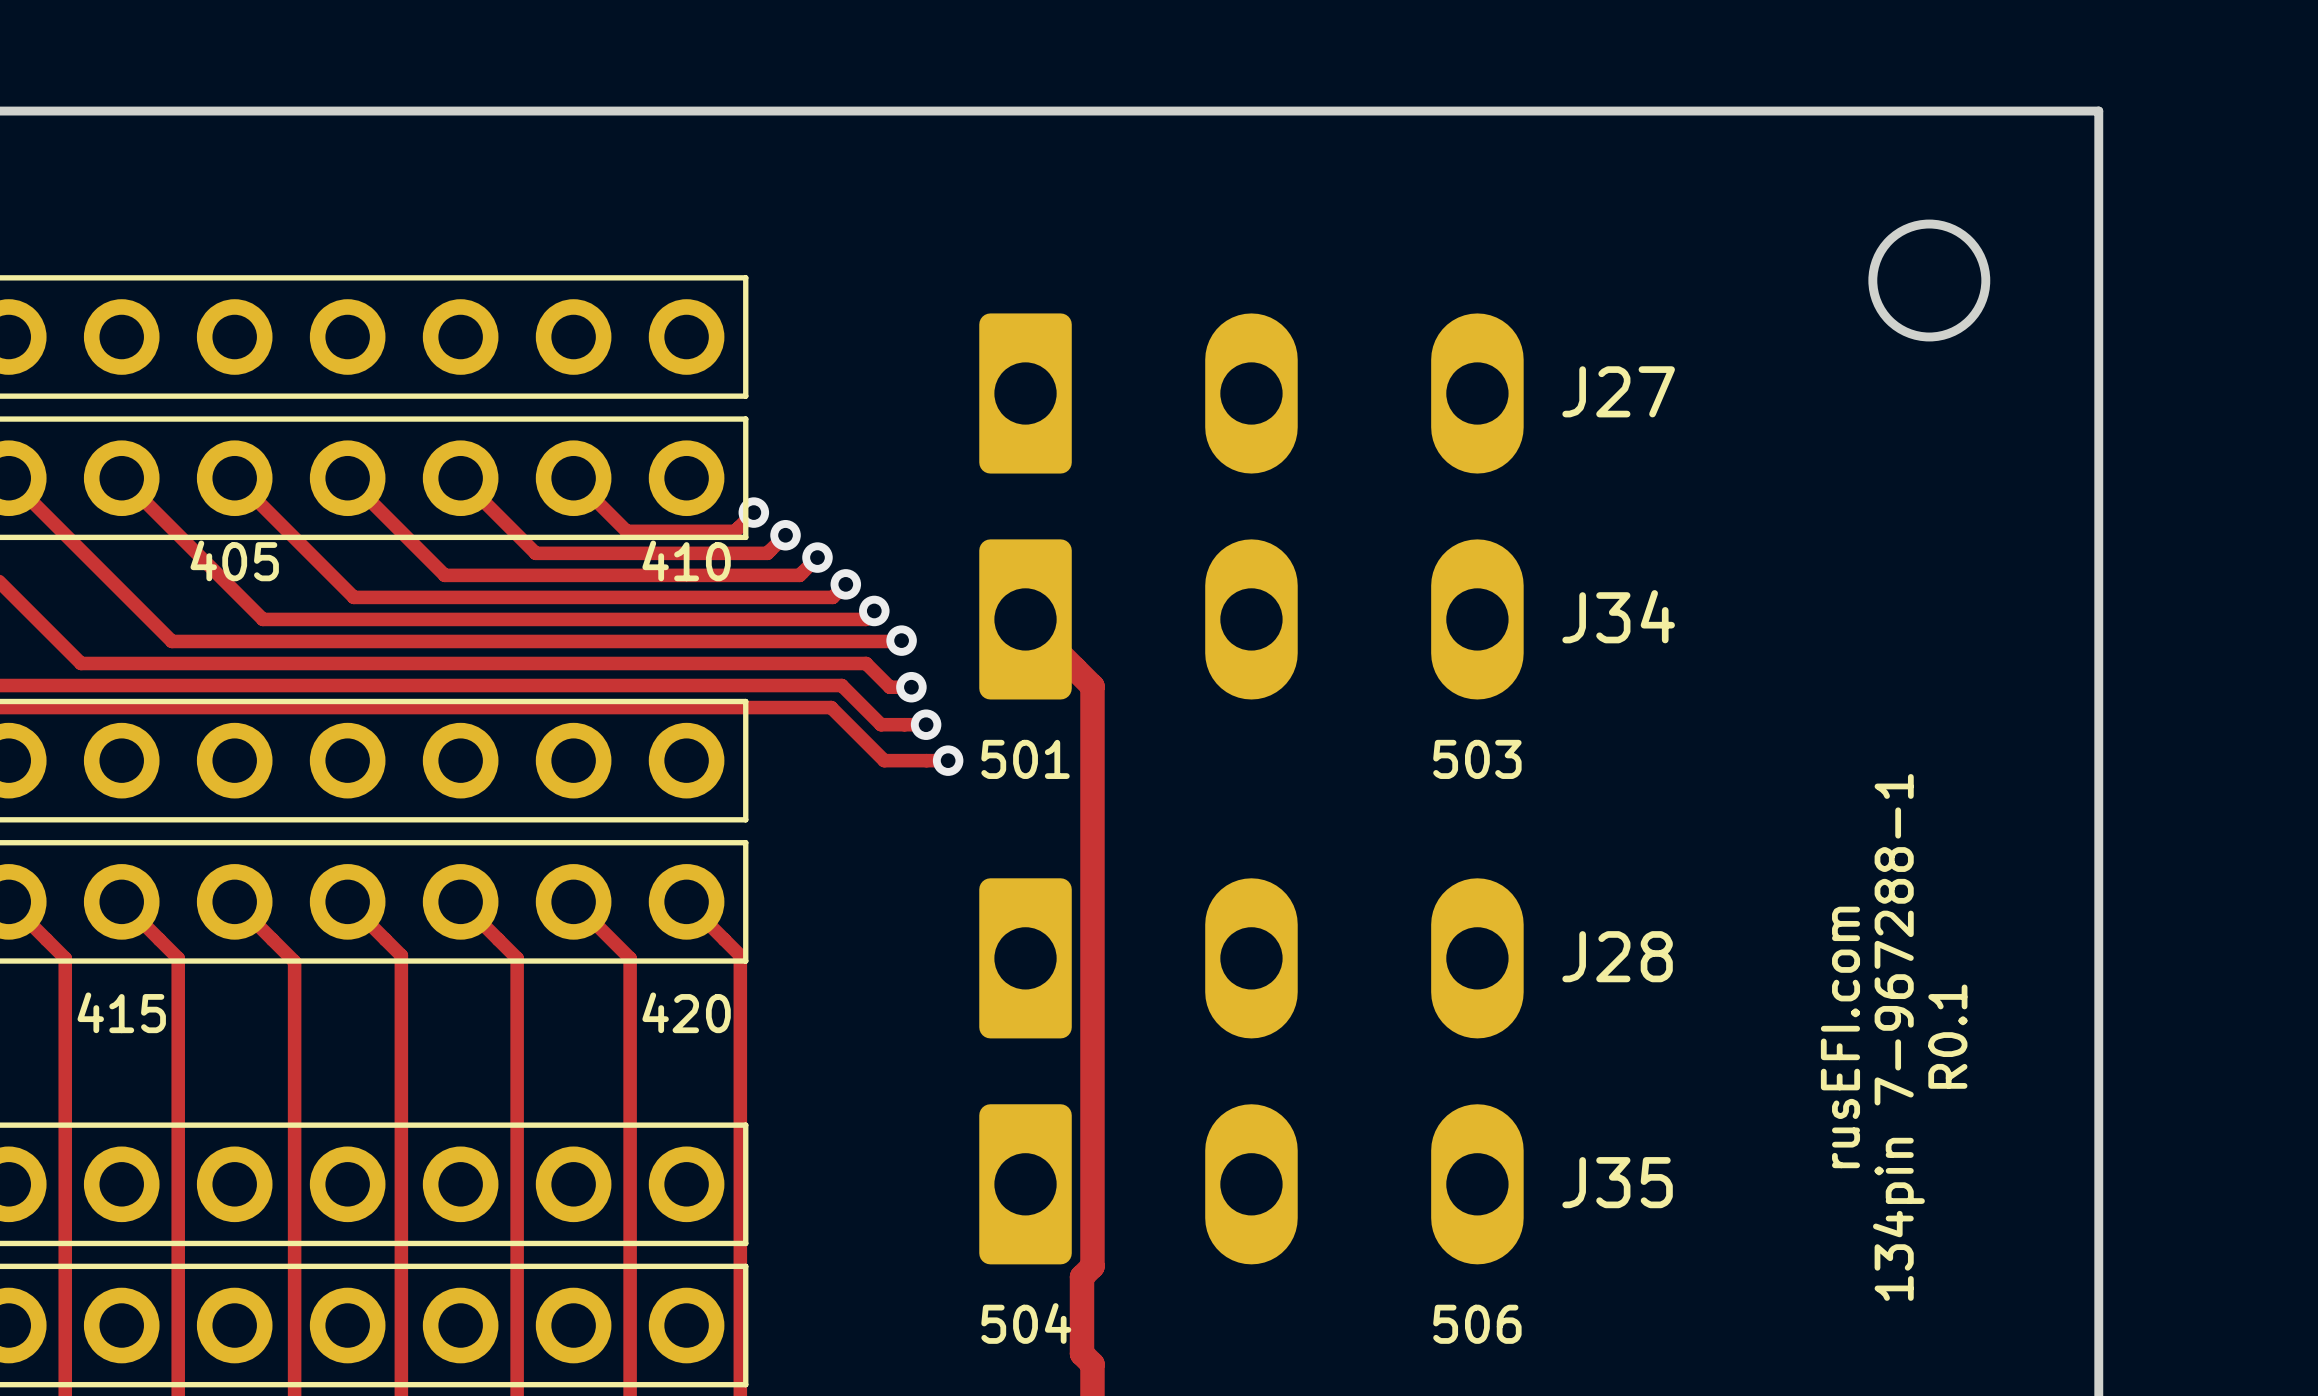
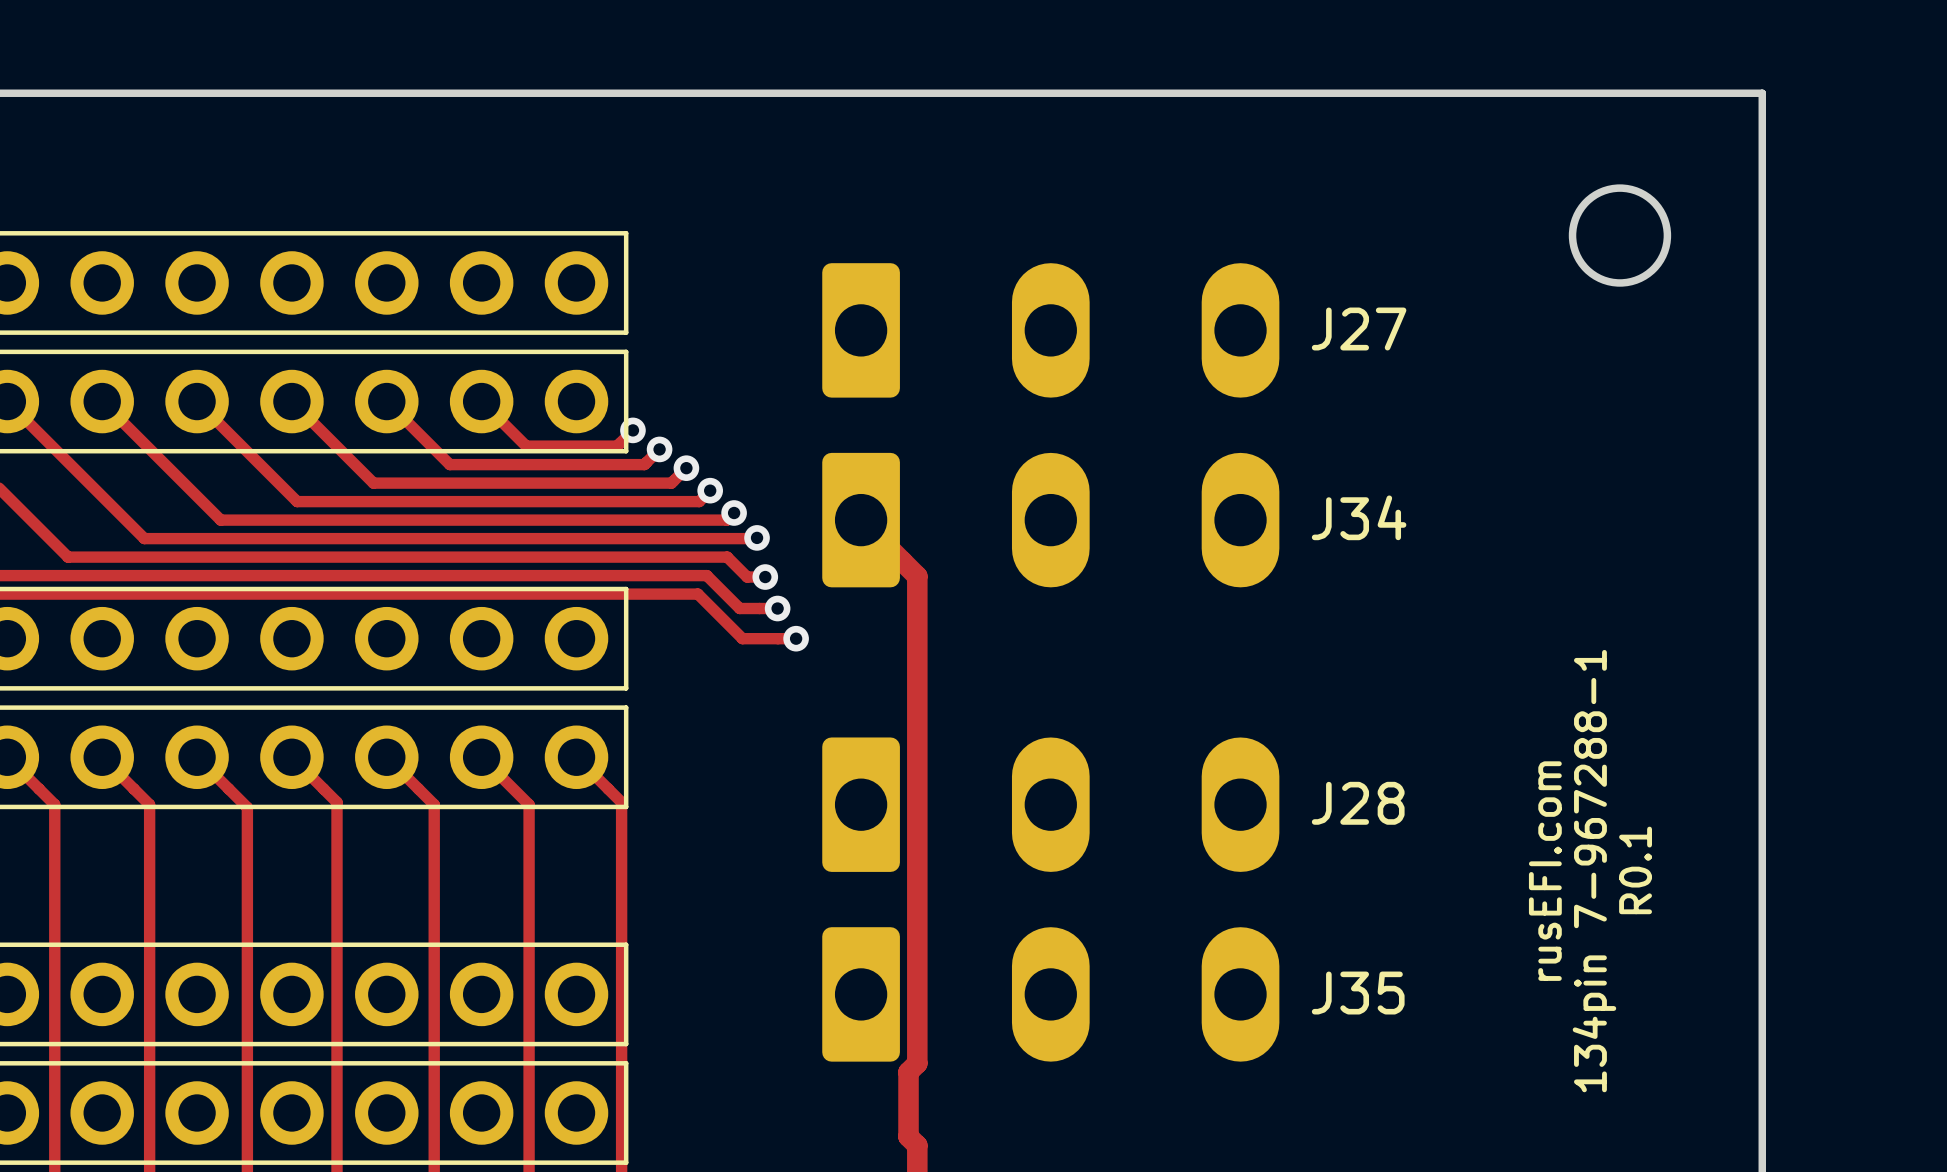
text: 405 (234, 560) -> none
text: 410 (686, 560) -> none
text: 501 (1025, 759) -> none
text: 503 (1477, 759) -> none
text: 415 (121, 1012) -> none
text: 420 (686, 1012) -> none
text: 504 (1026, 1323) -> none
text: 506 (1477, 1324) -> none

